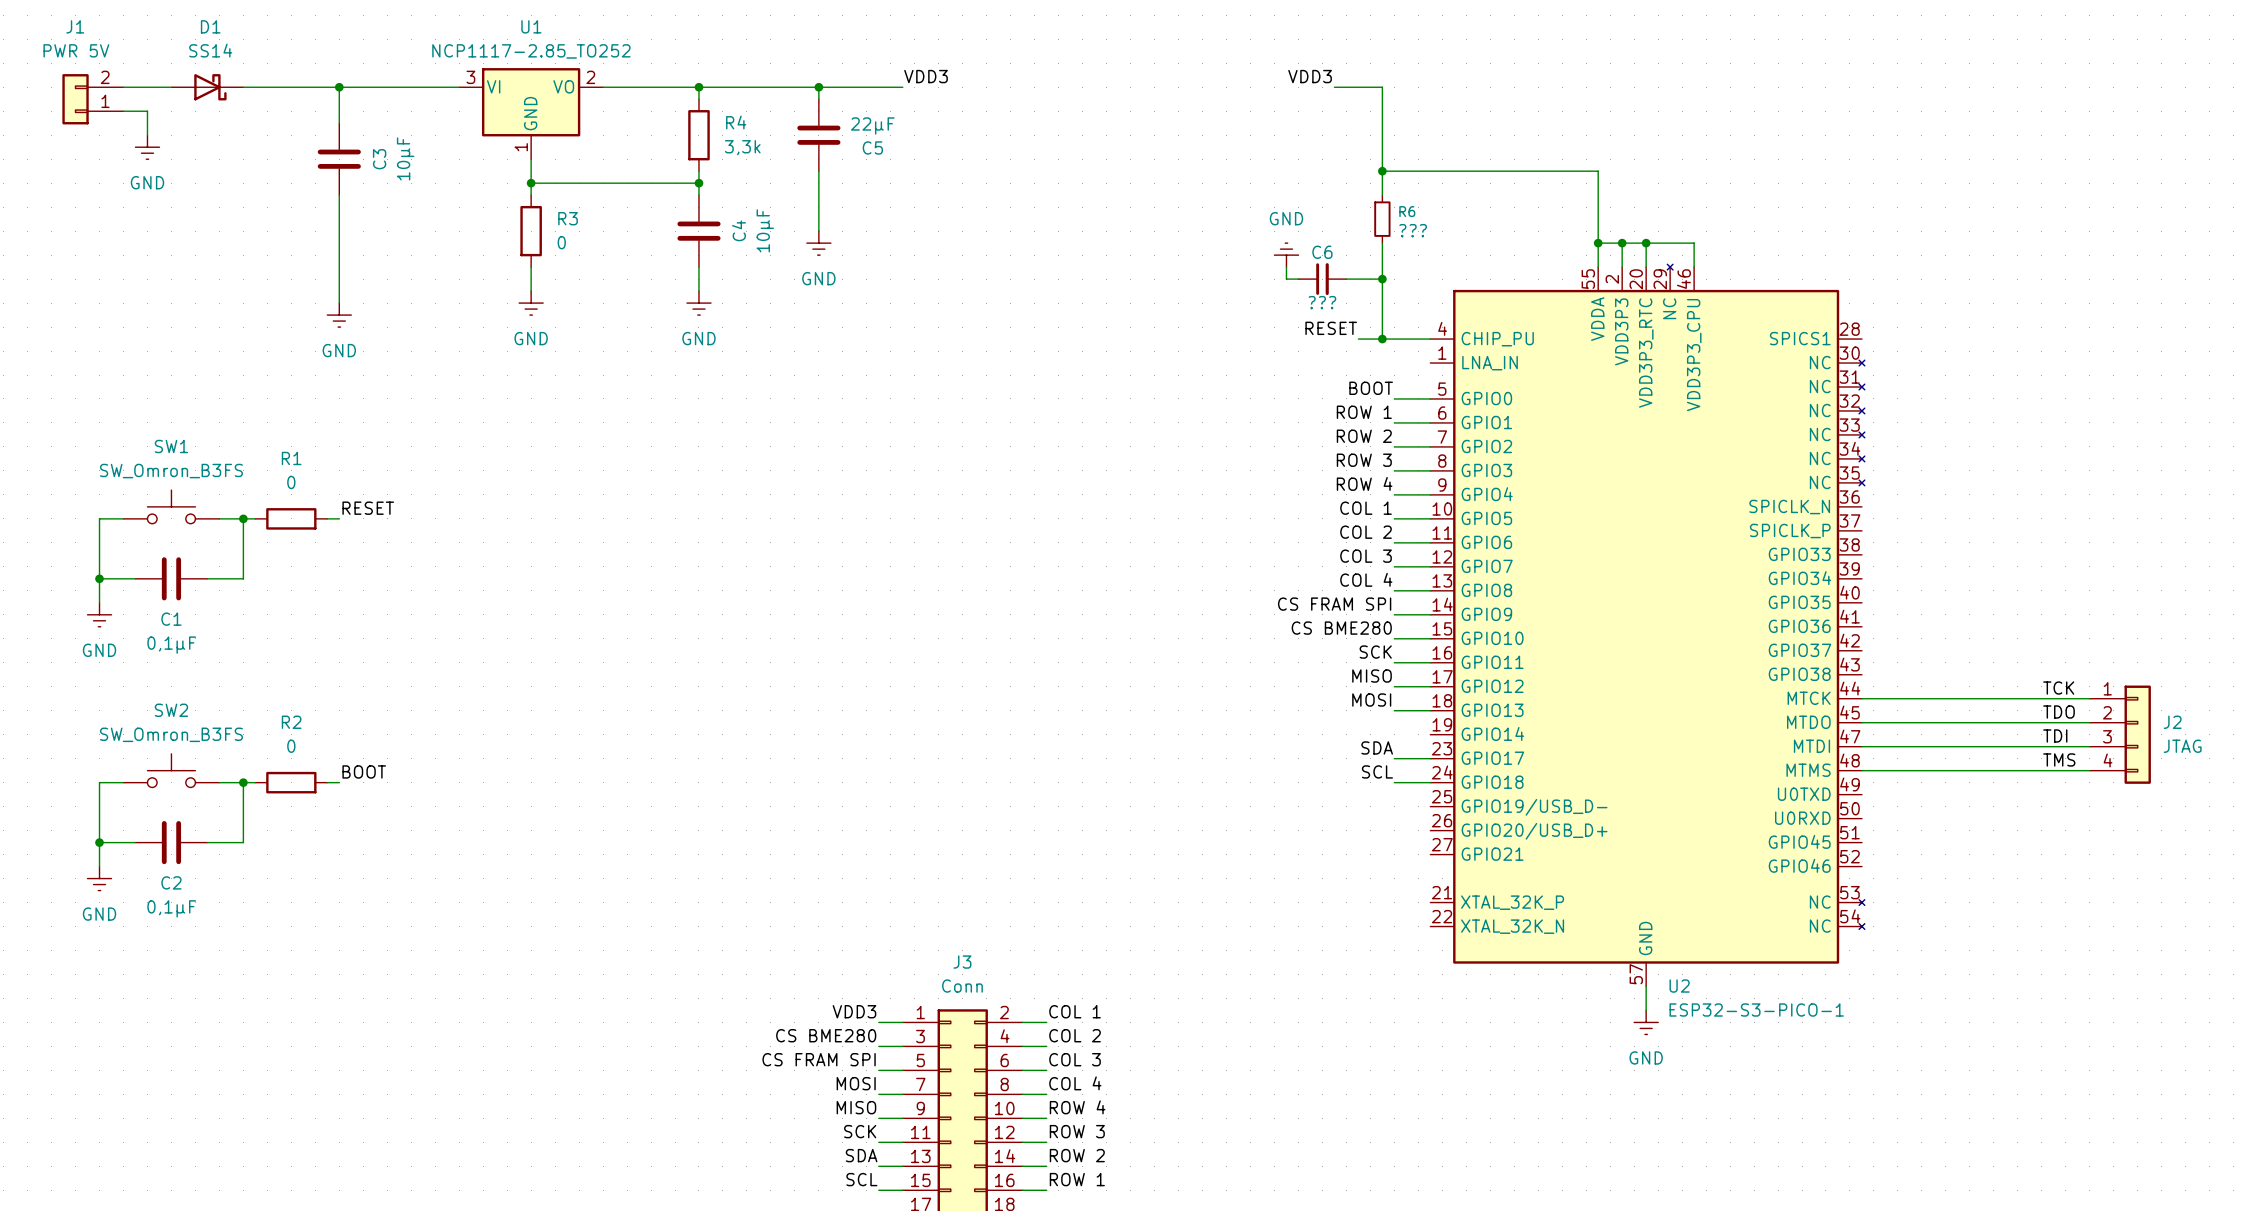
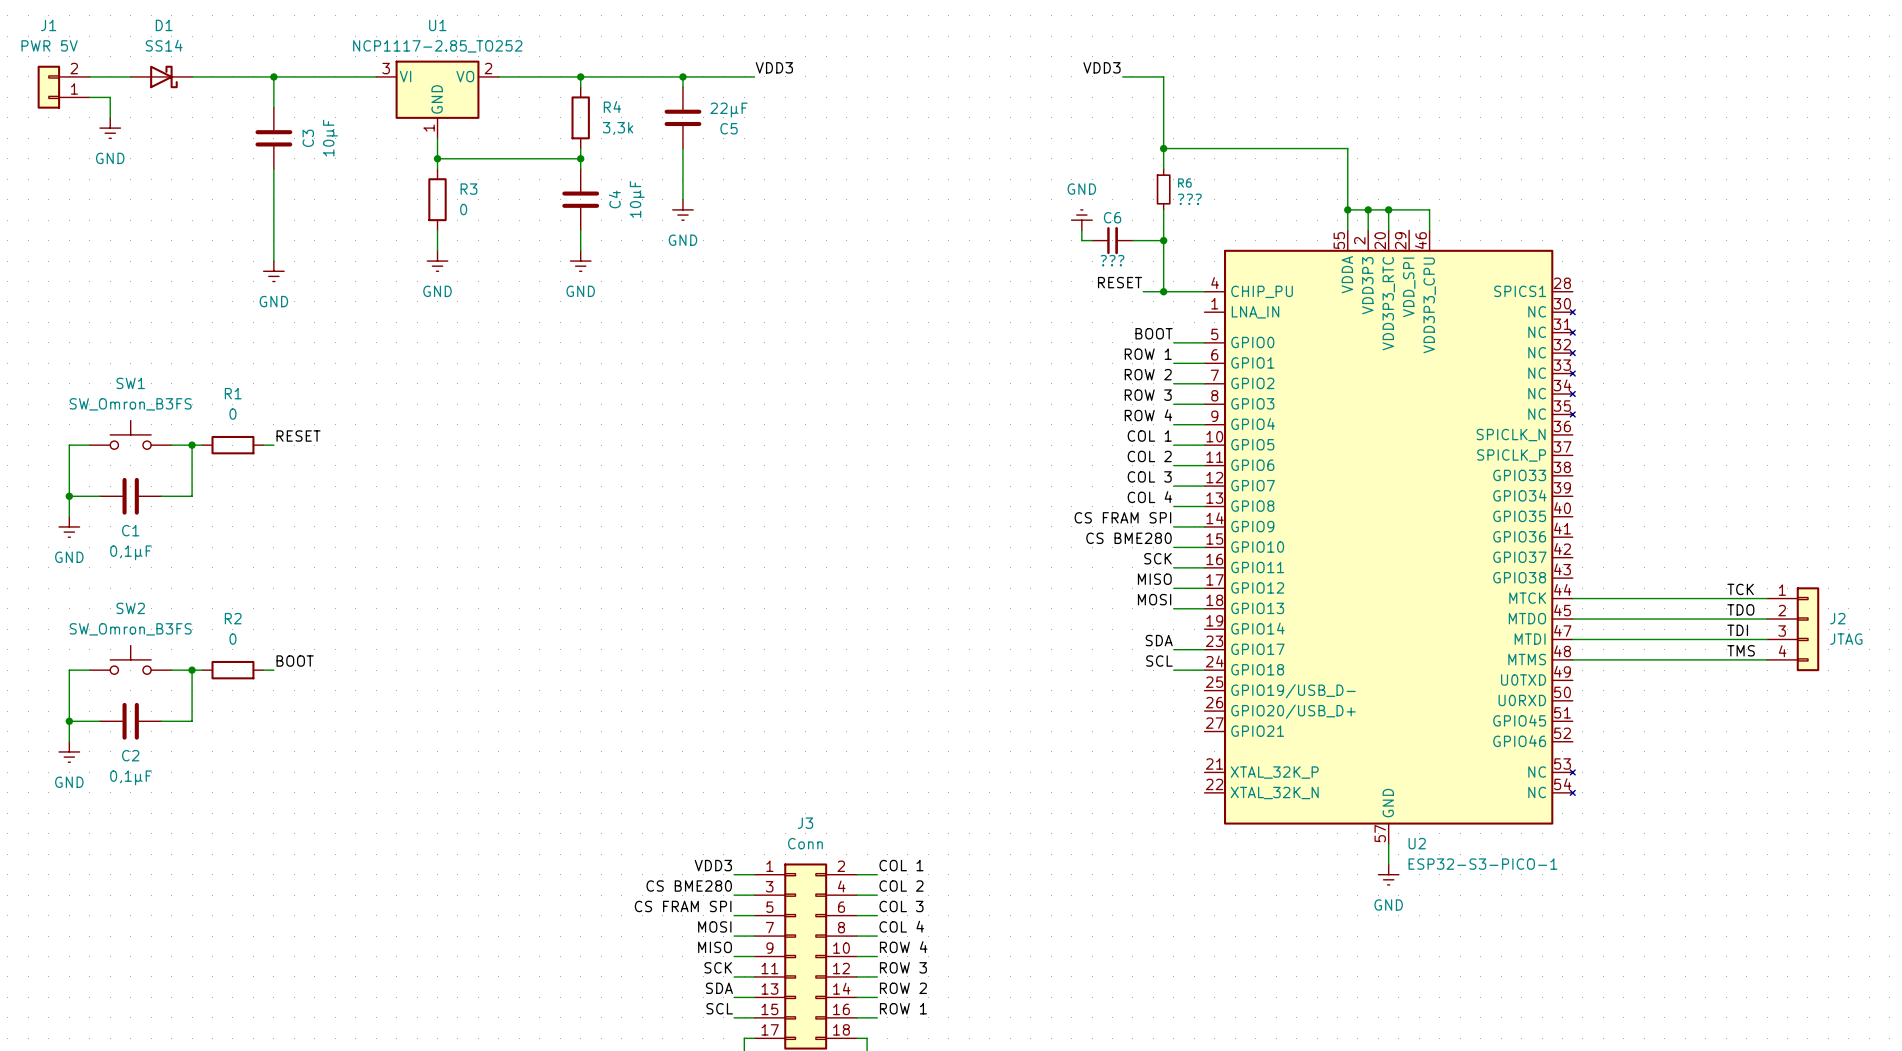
U2 symbol: [1430, 264, 1865, 987] -> [1204, 230, 1576, 845]

